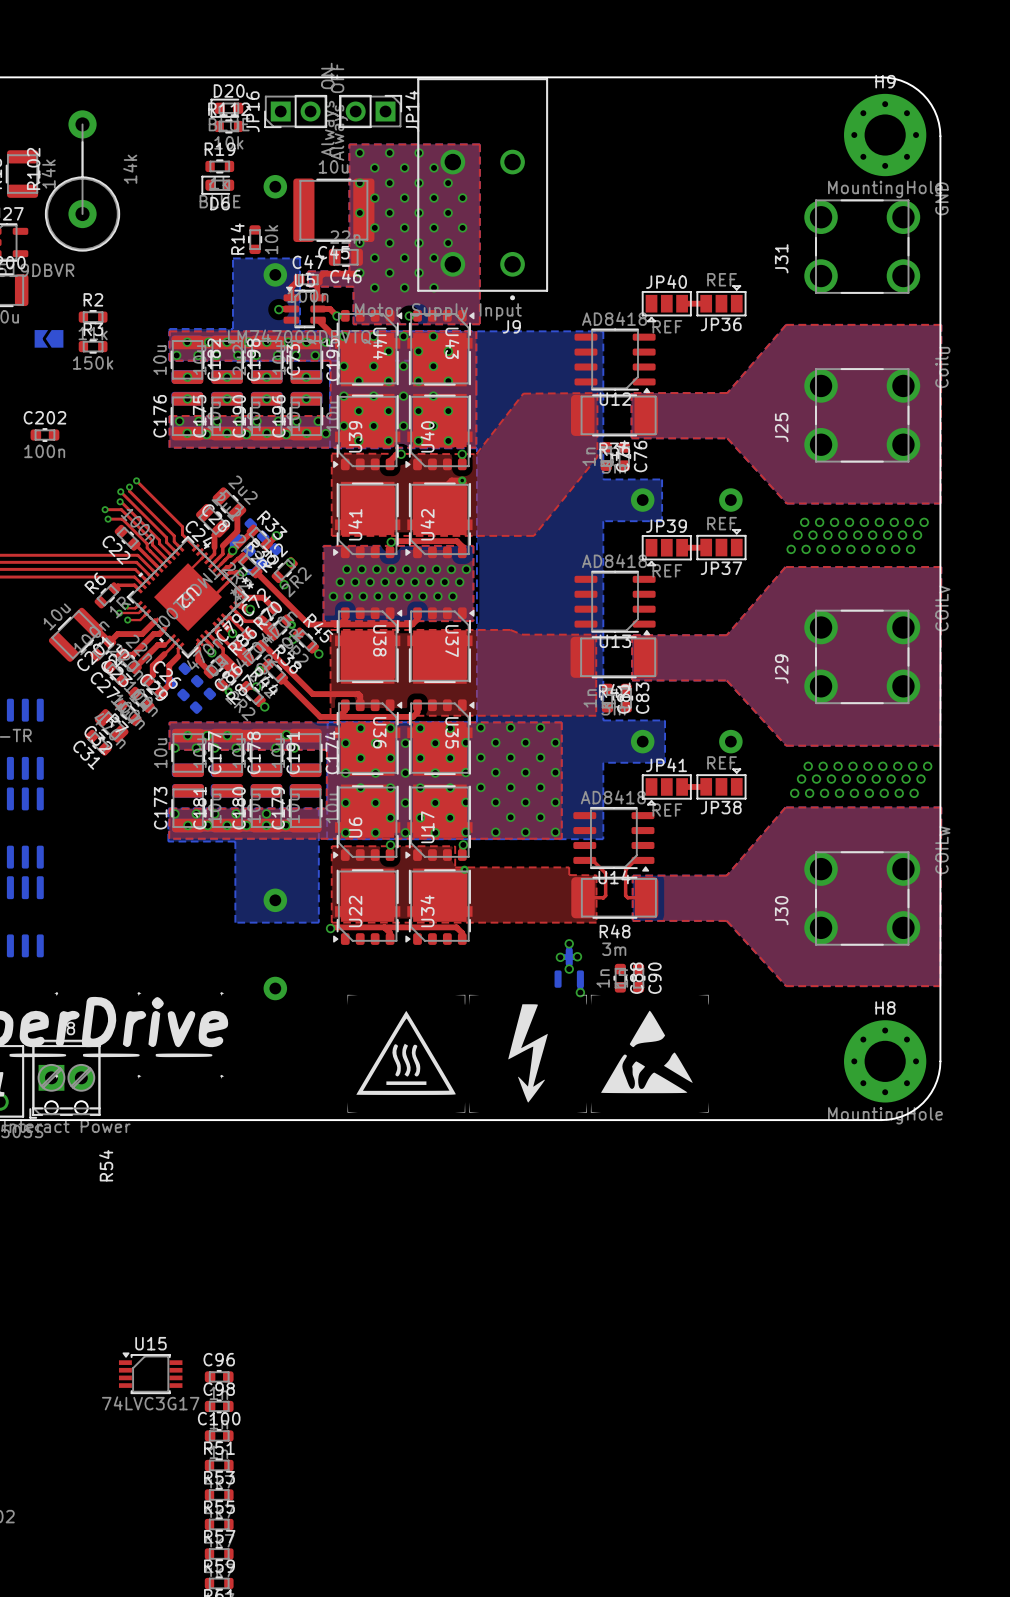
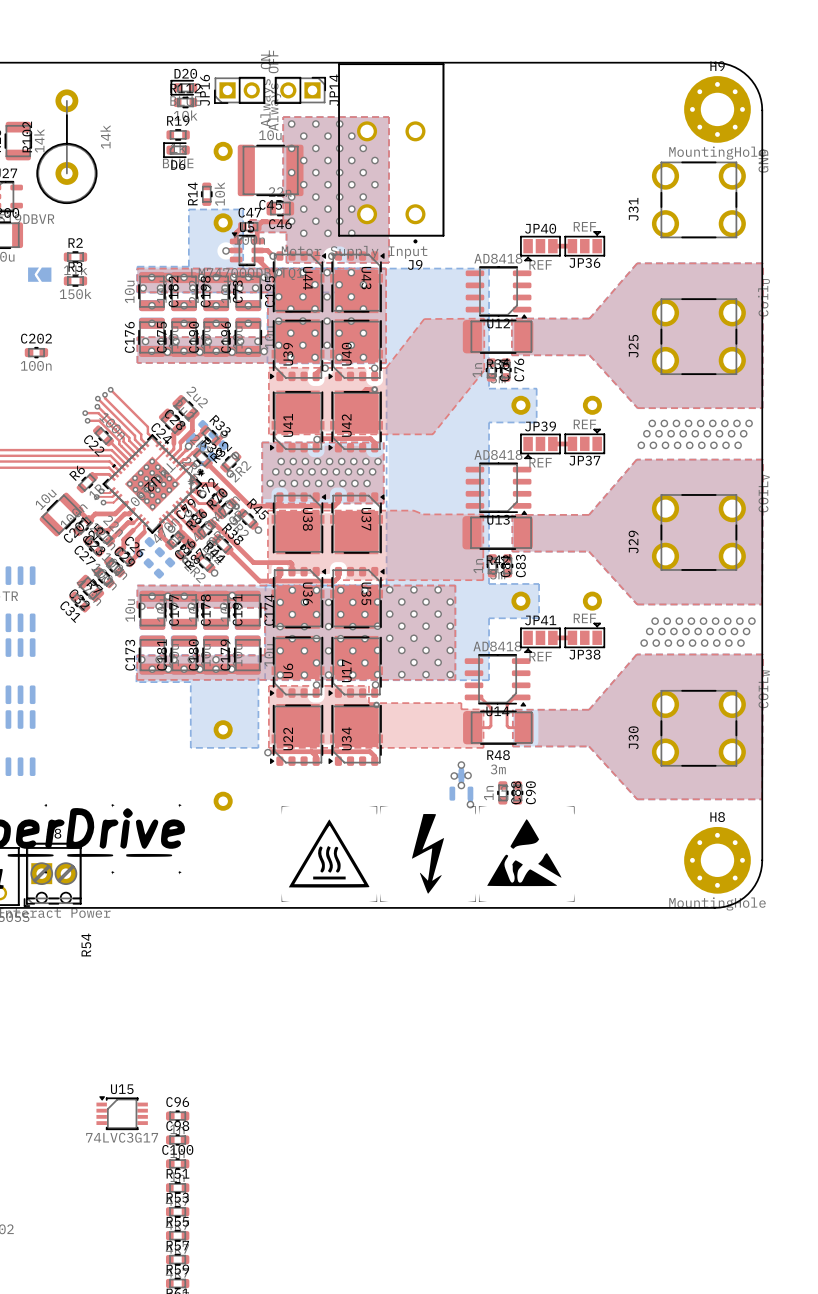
via: none -> (152, 461)
via: none -> (146, 467)
via: none -> (157, 467)
via: none -> (140, 472)
via: none -> (152, 472)
via: none -> (163, 472)
via: none -> (135, 478)
via: none -> (146, 478)
via: none -> (157, 478)
via: none -> (169, 478)
via: none -> (129, 483)
via: none -> (140, 483)
via: none -> (152, 484)
via: none -> (163, 484)
via: none -> (175, 484)
via: none -> (135, 489)
via: none -> (146, 489)
via: none -> (157, 490)
via: none -> (169, 490)
via: none -> (141, 495)
via: none -> (152, 495)
via: none -> (163, 495)
via: none -> (146, 501)
via: none -> (157, 501)
via: none -> (152, 506)

